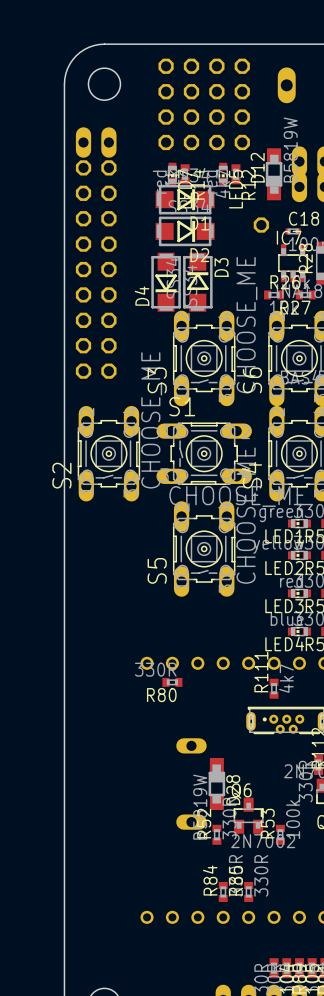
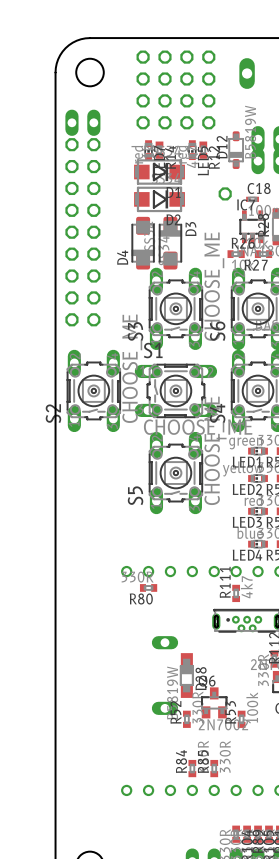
D12 footprint: [265, 148, 283, 201] -> [228, 131, 244, 169]
D4 footprint: [151, 252, 181, 312] -> [131, 216, 155, 270]
D3 footprint: [183, 252, 213, 312] -> [158, 216, 183, 270]

